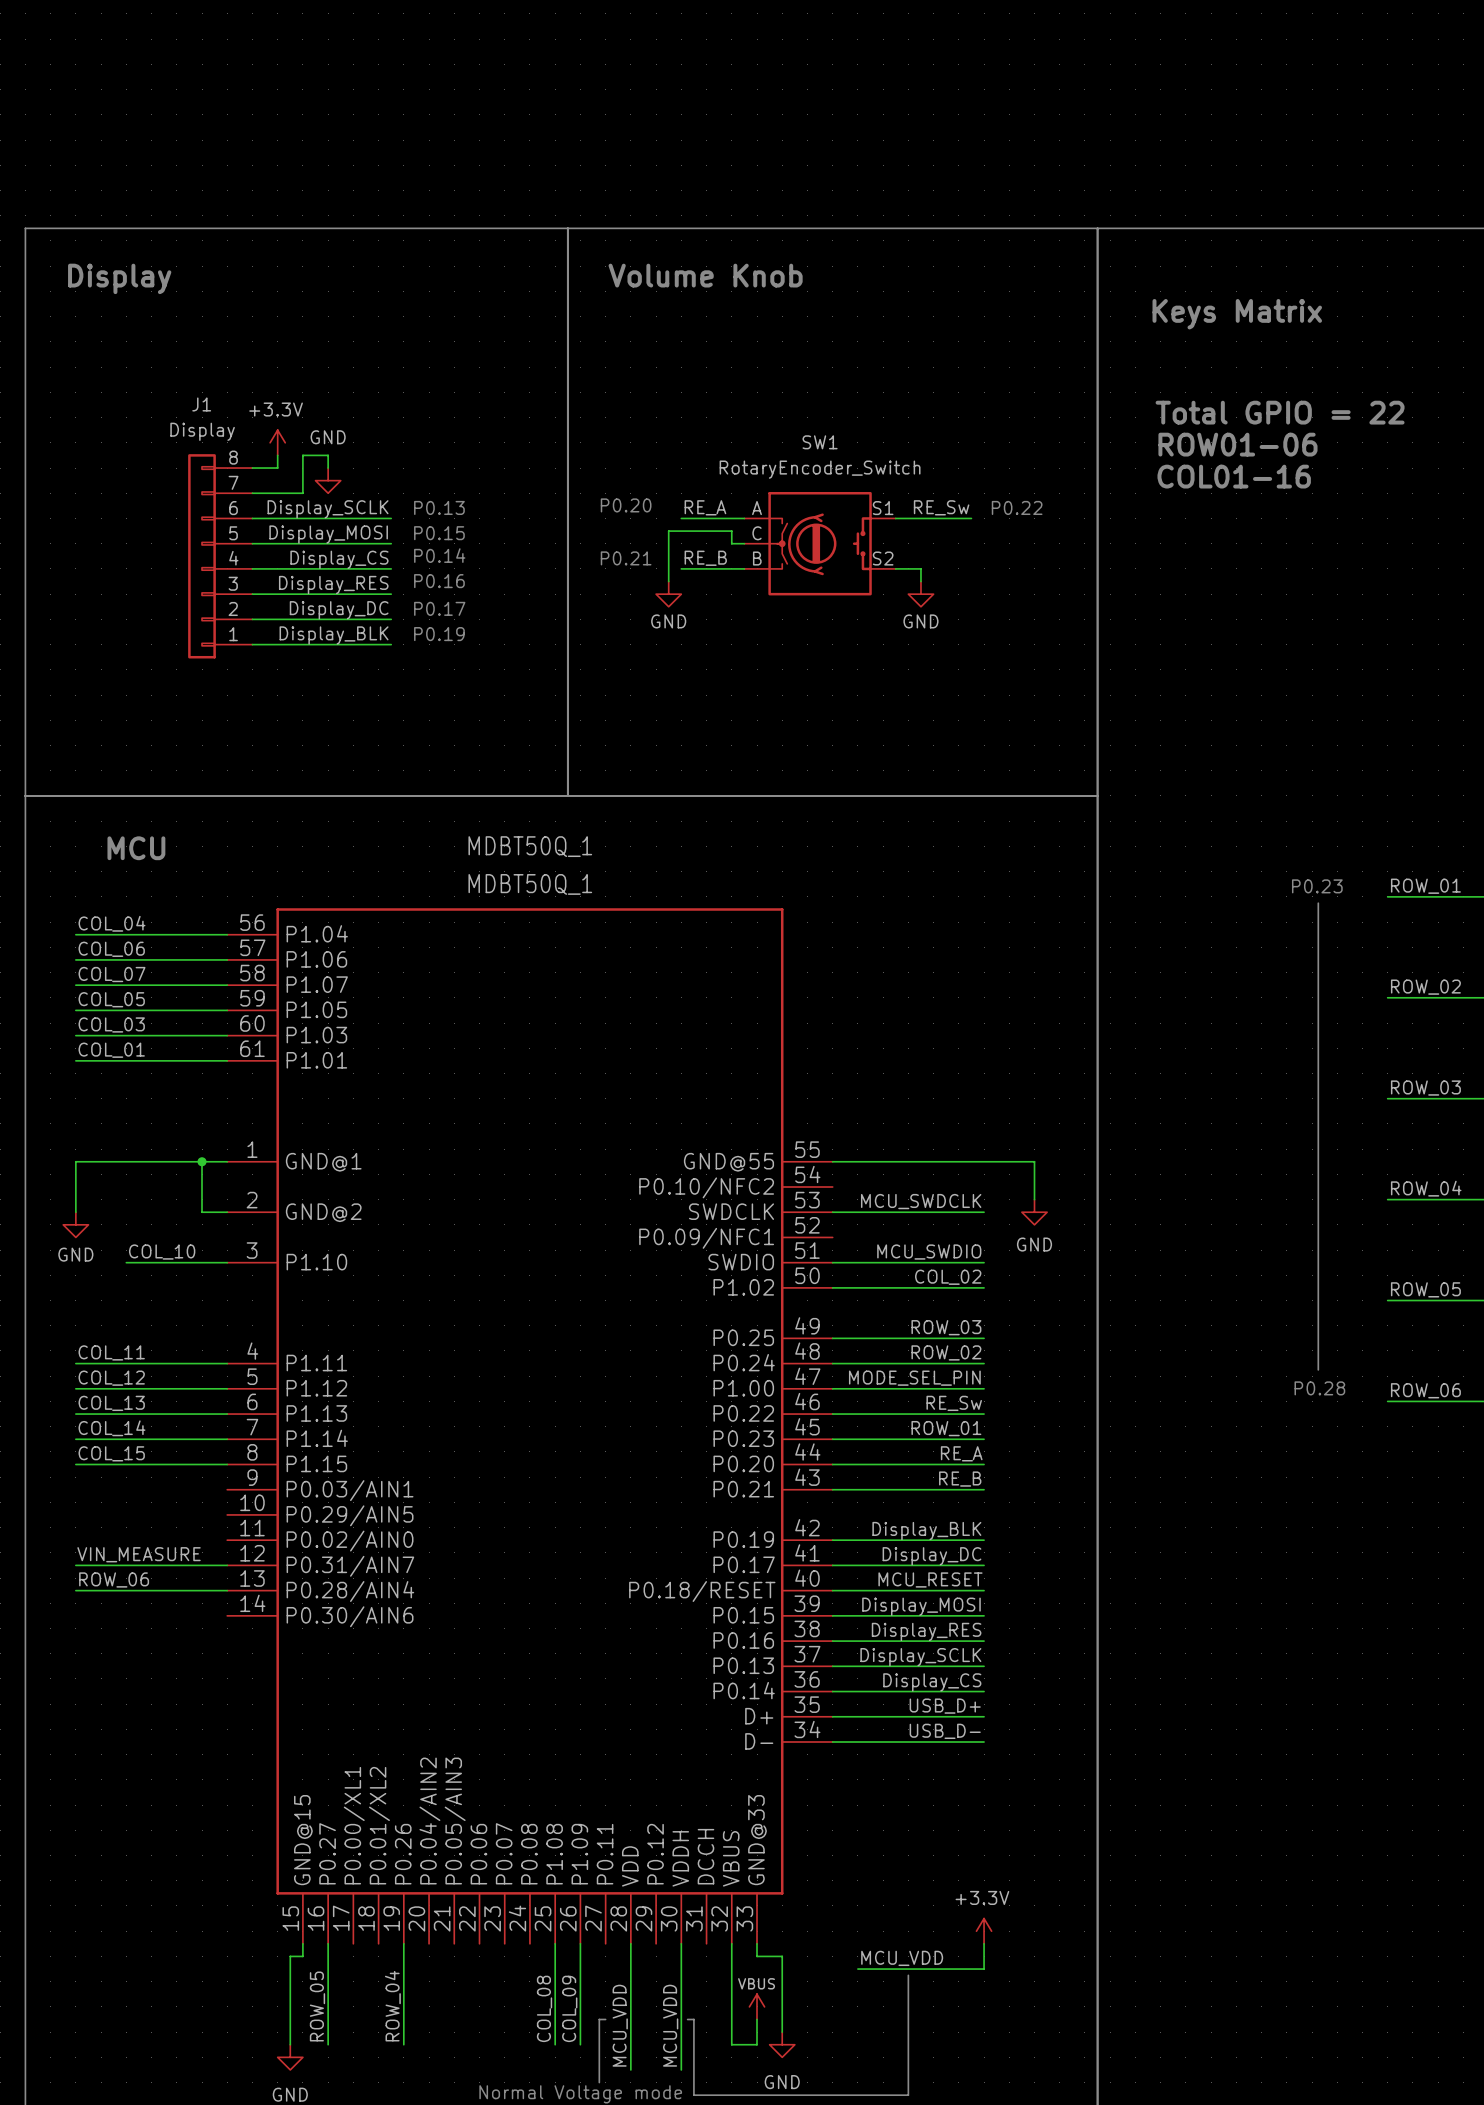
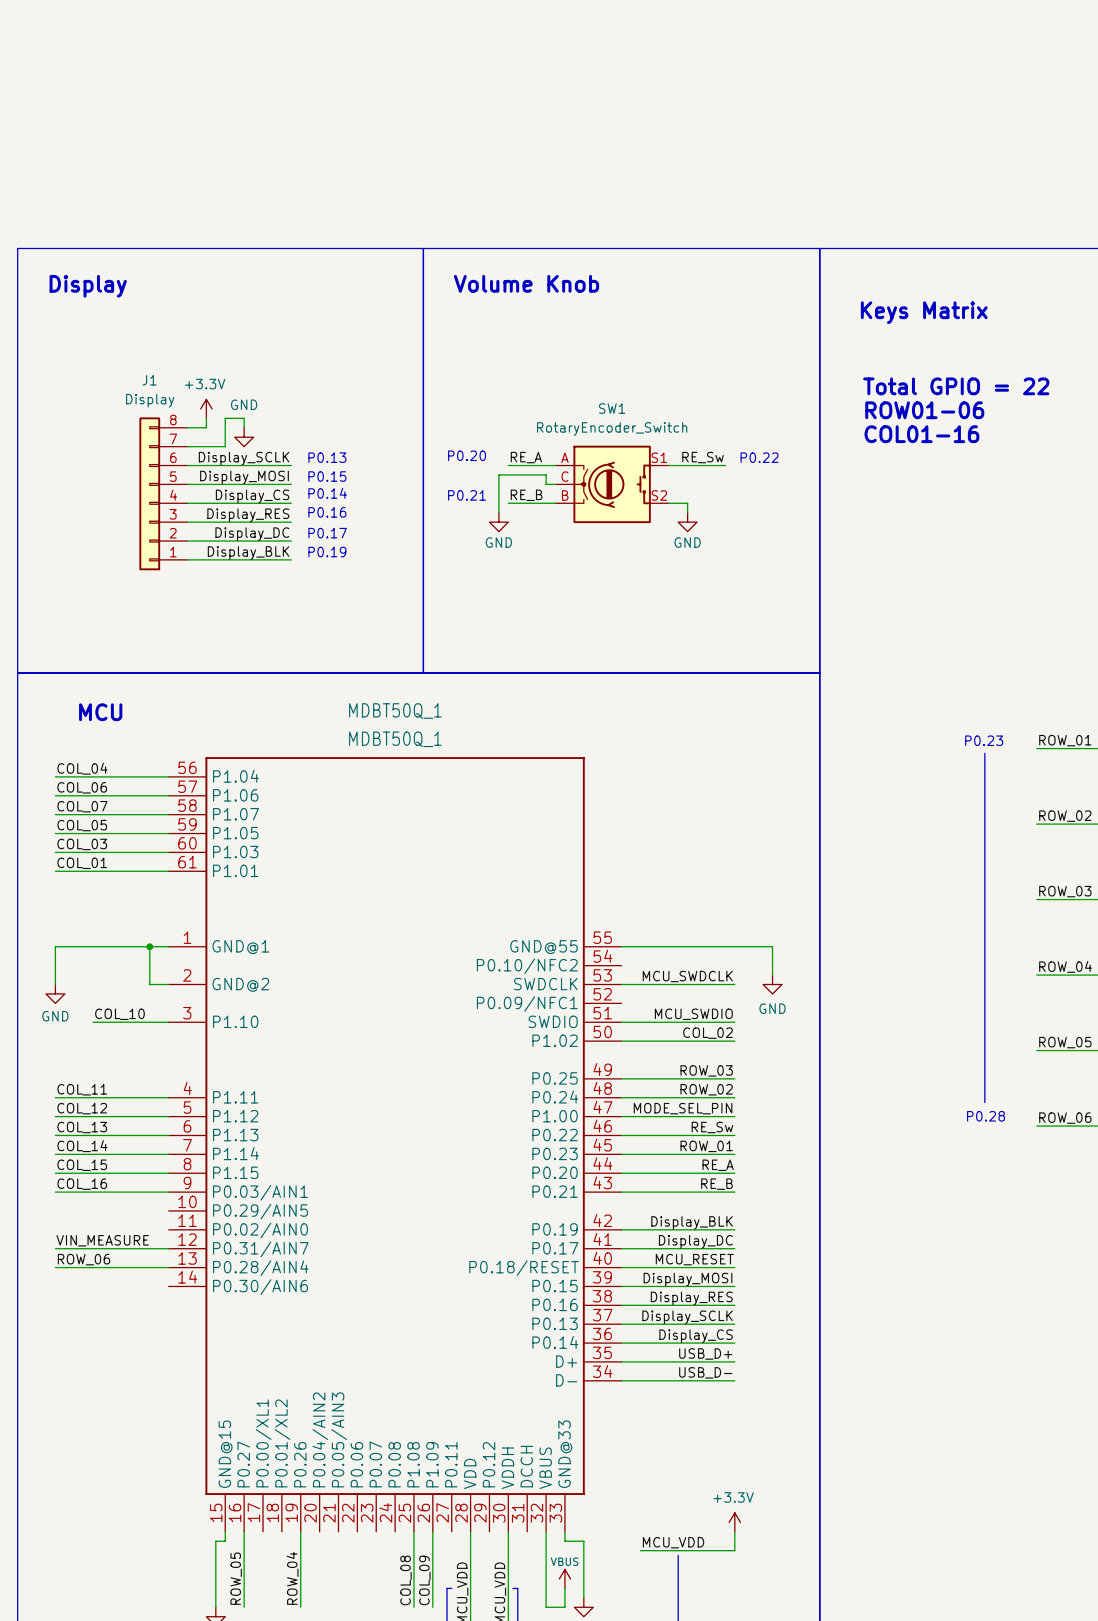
label: none -> COL_16 (82, 1184)
wire: none -> (55, 1192) (168, 1192)

